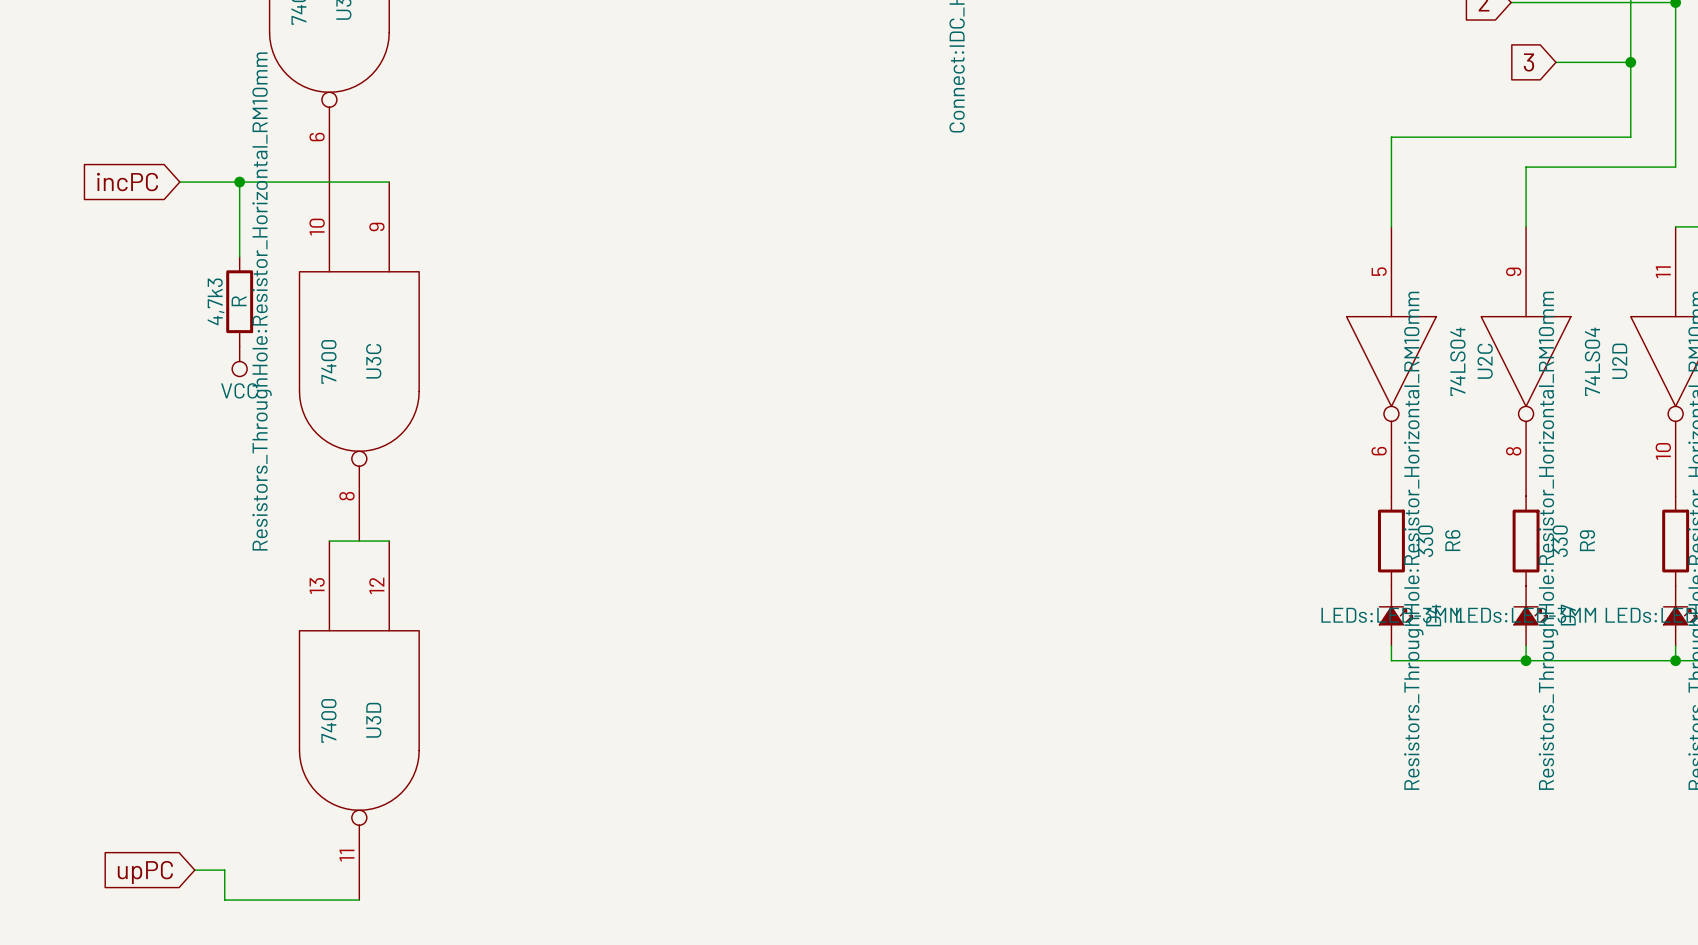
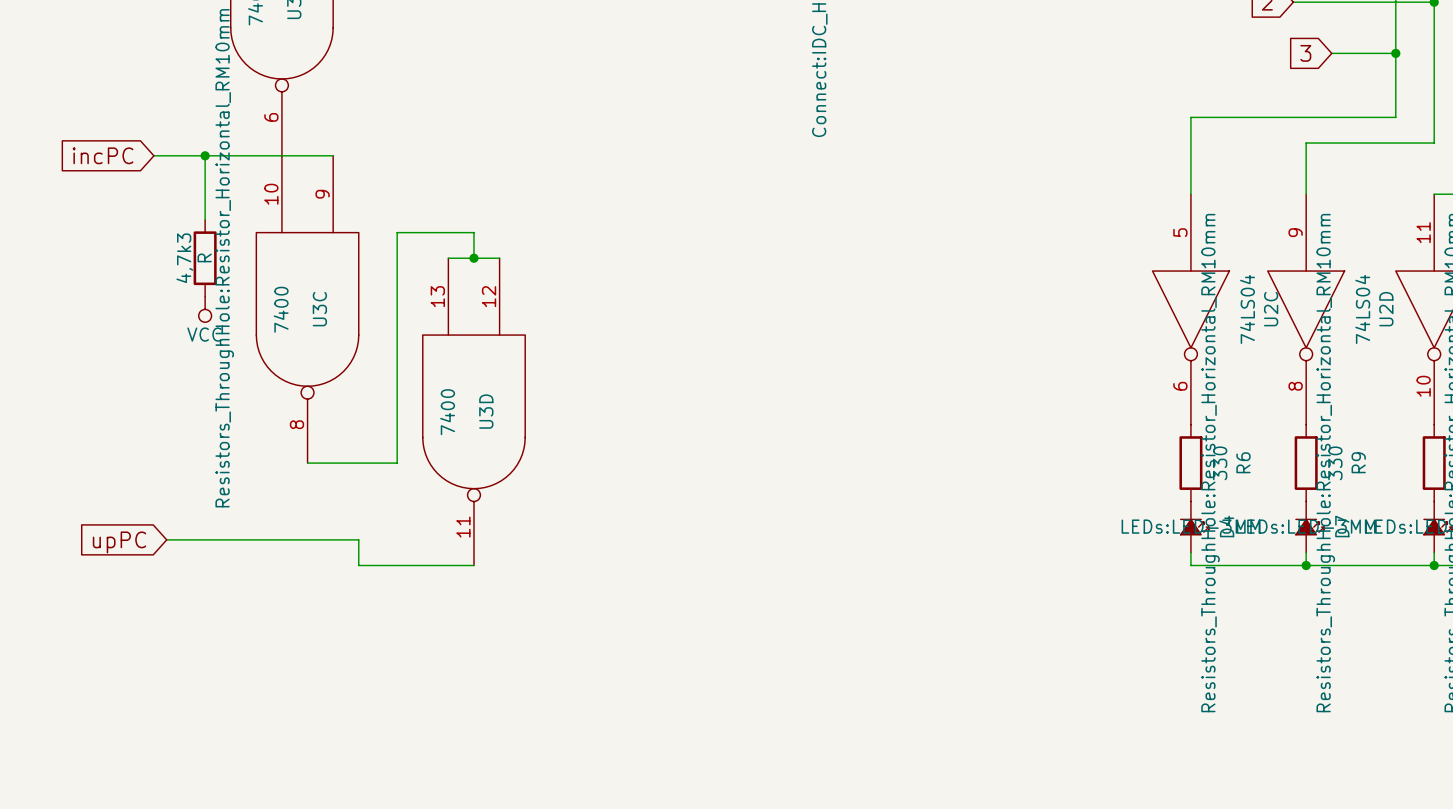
wire: none -> (448, 258) (499, 258)
wire: none -> (473, 258) (473, 232) (397, 232) (397, 463) (333, 463)
junction: none -> (473, 258)
wire: (329, 541) (359, 541) -> none
wire: none -> (166, 539) (358, 539) (358, 565) (473, 565)
U3D position: (359, 720) -> (473, 411)
wire: (194, 870) (224, 870) (224, 900) (359, 900) -> none
global label position: upPC (145, 872) -> upPC (119, 542)

